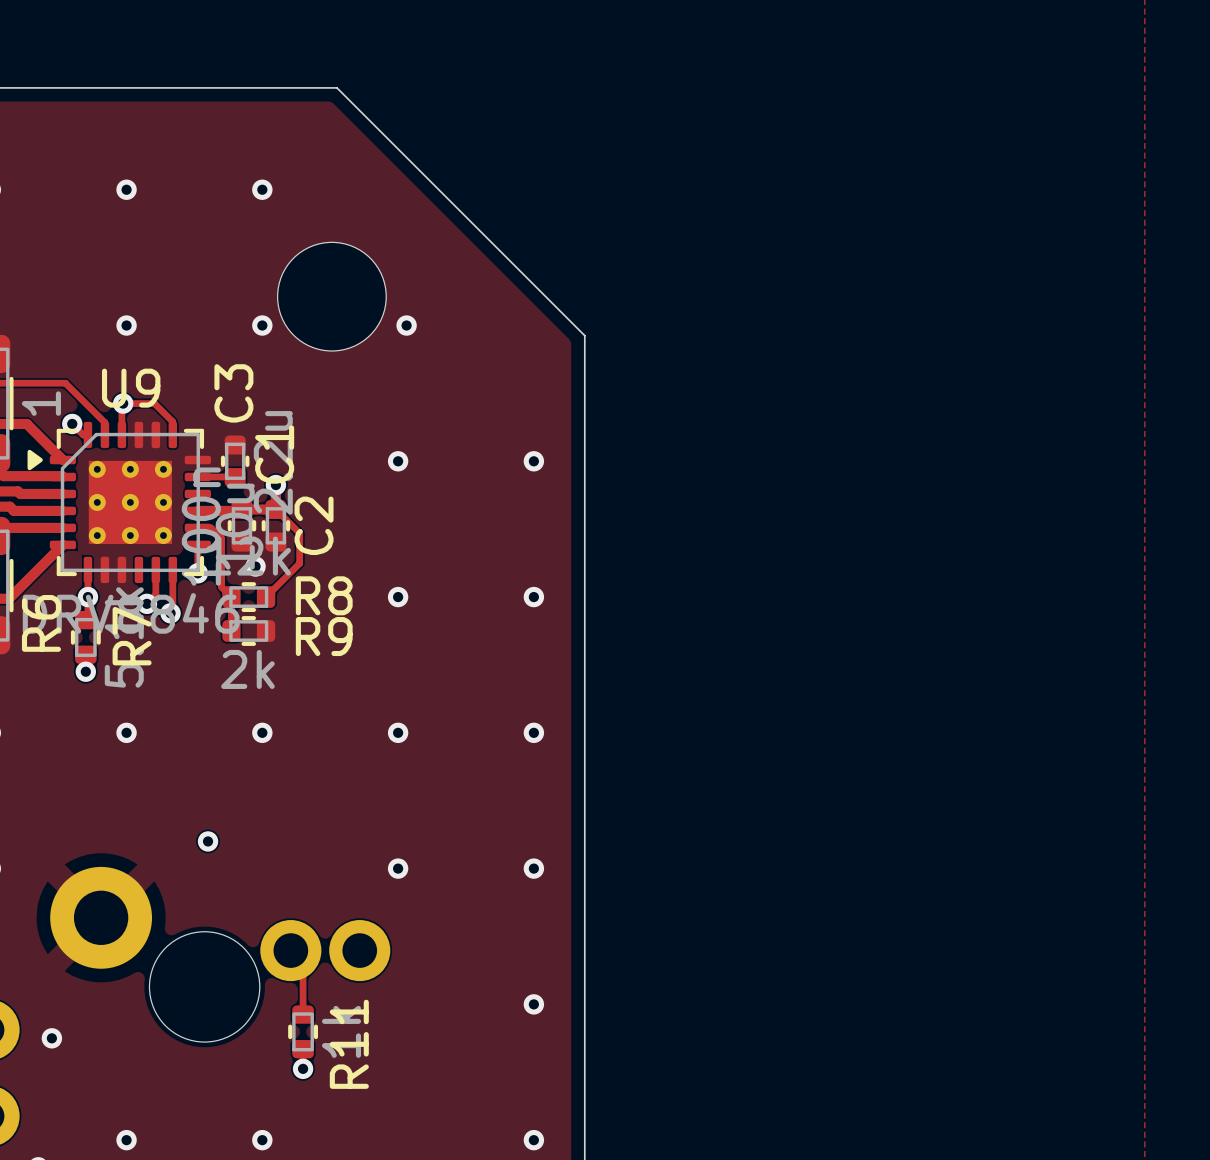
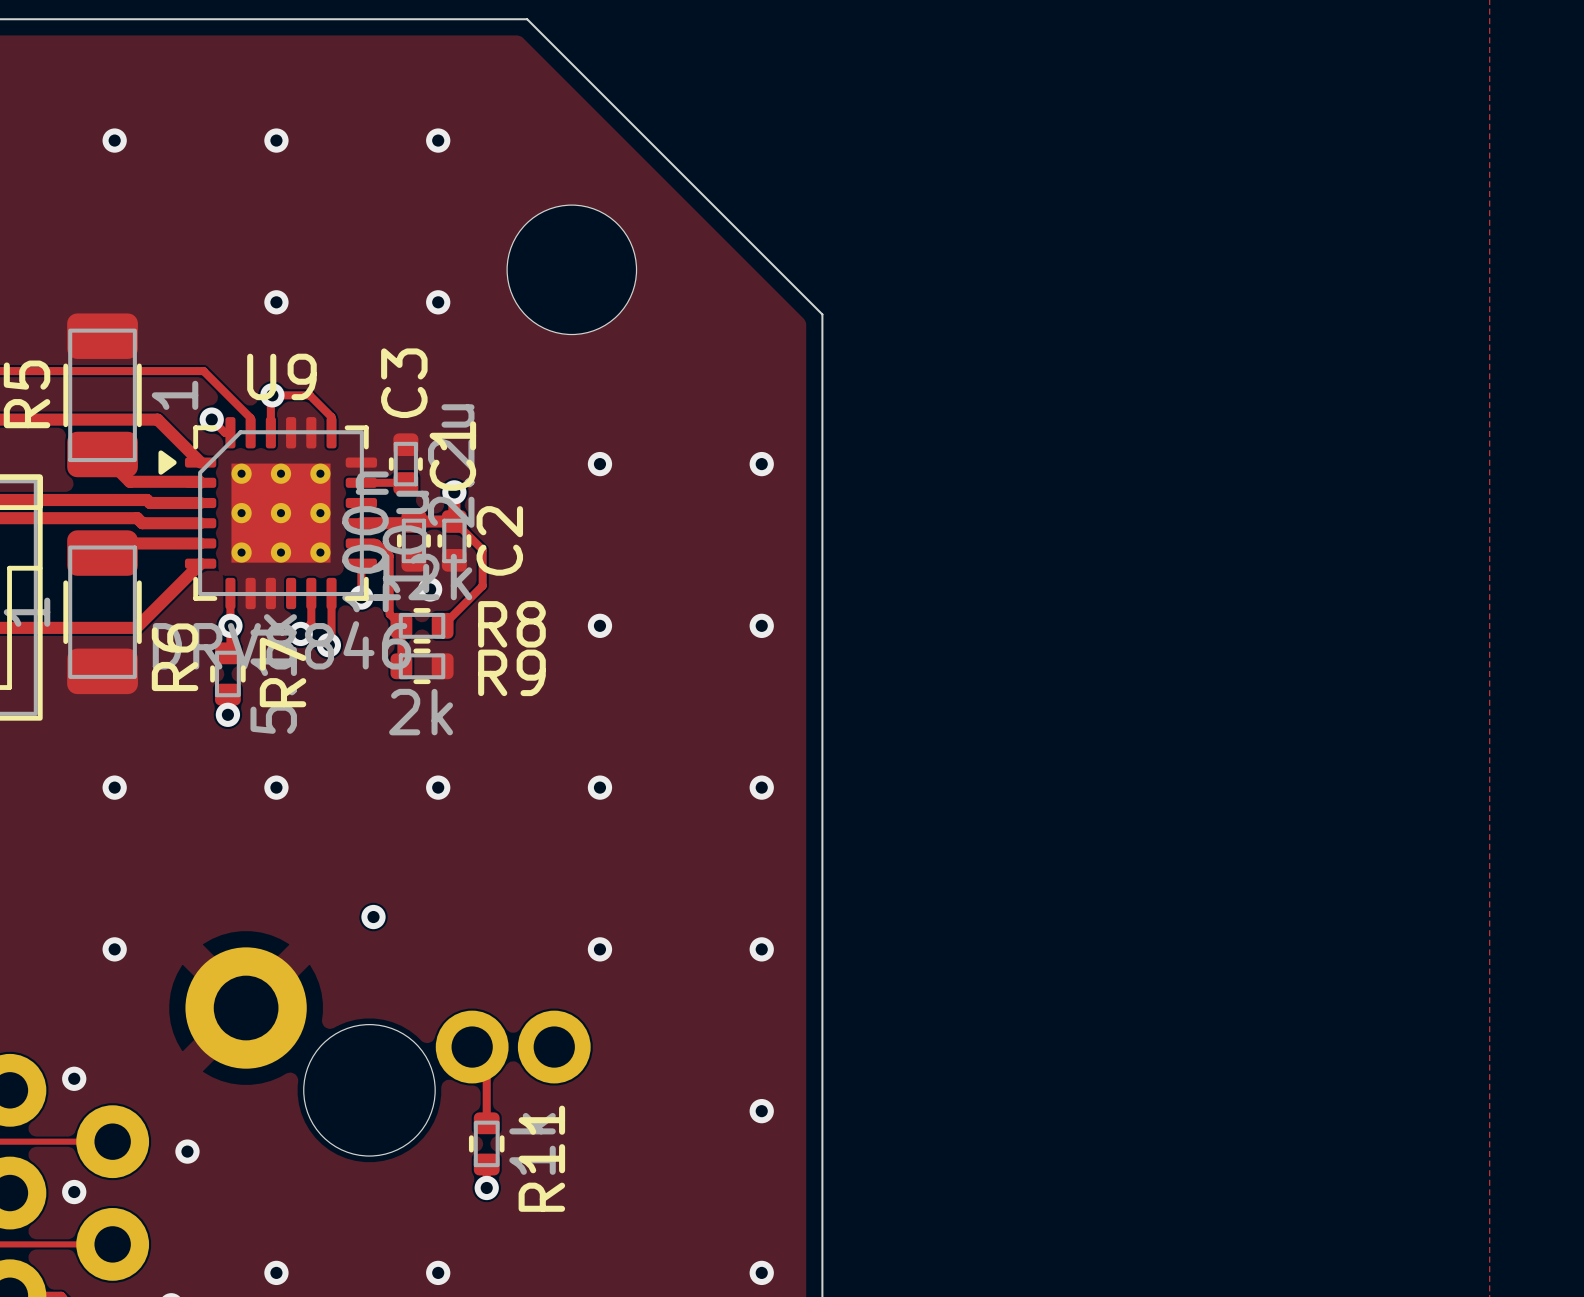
part position: (331, 296) -> (571, 269)
via: (406, 325) -> none

